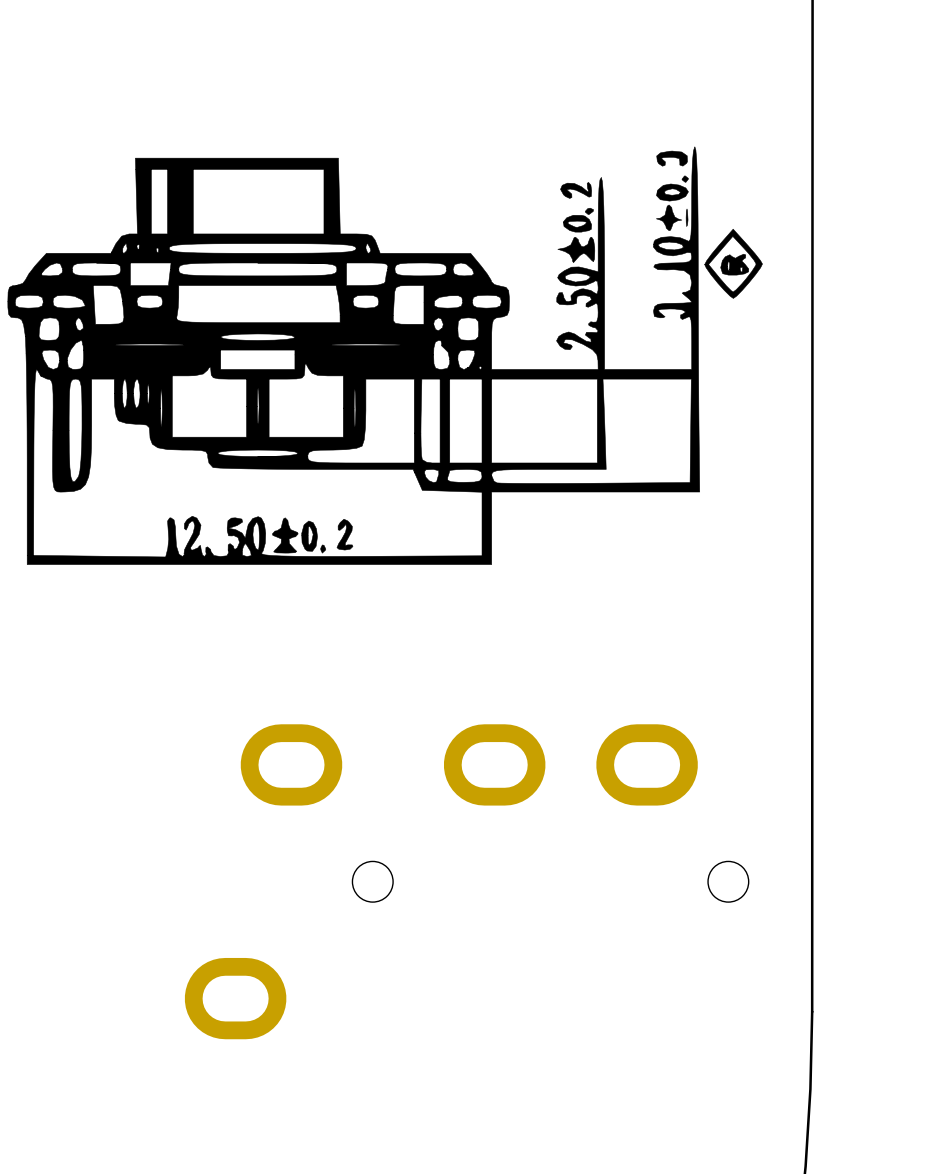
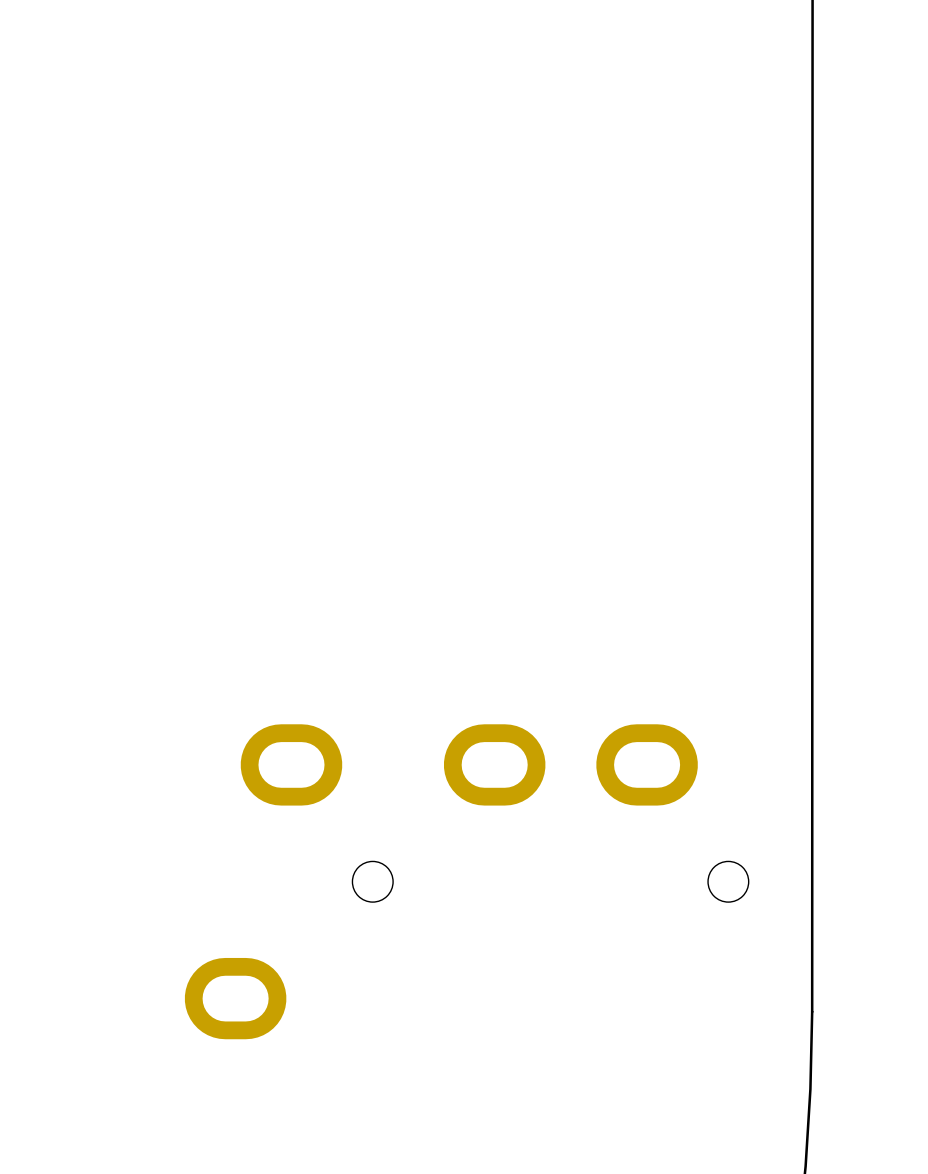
drawing: [7, 146, 763, 565] -> none

